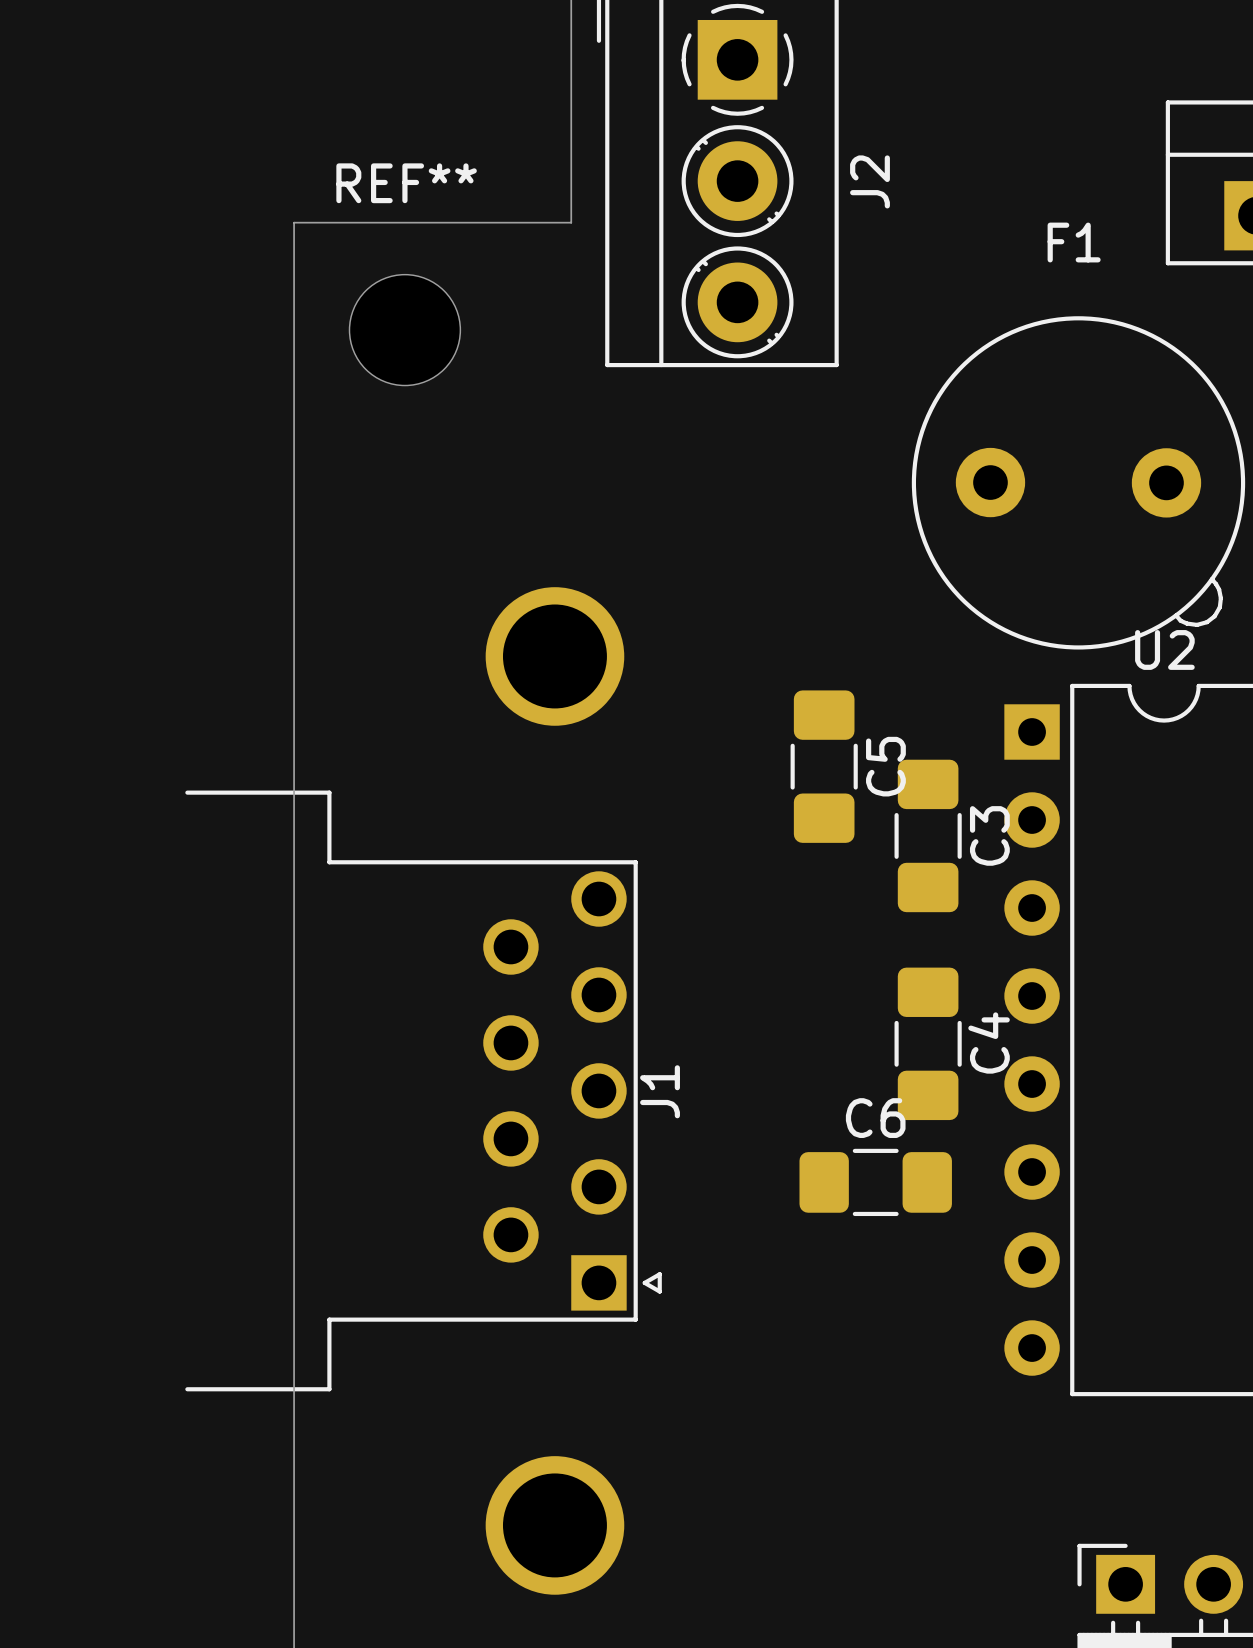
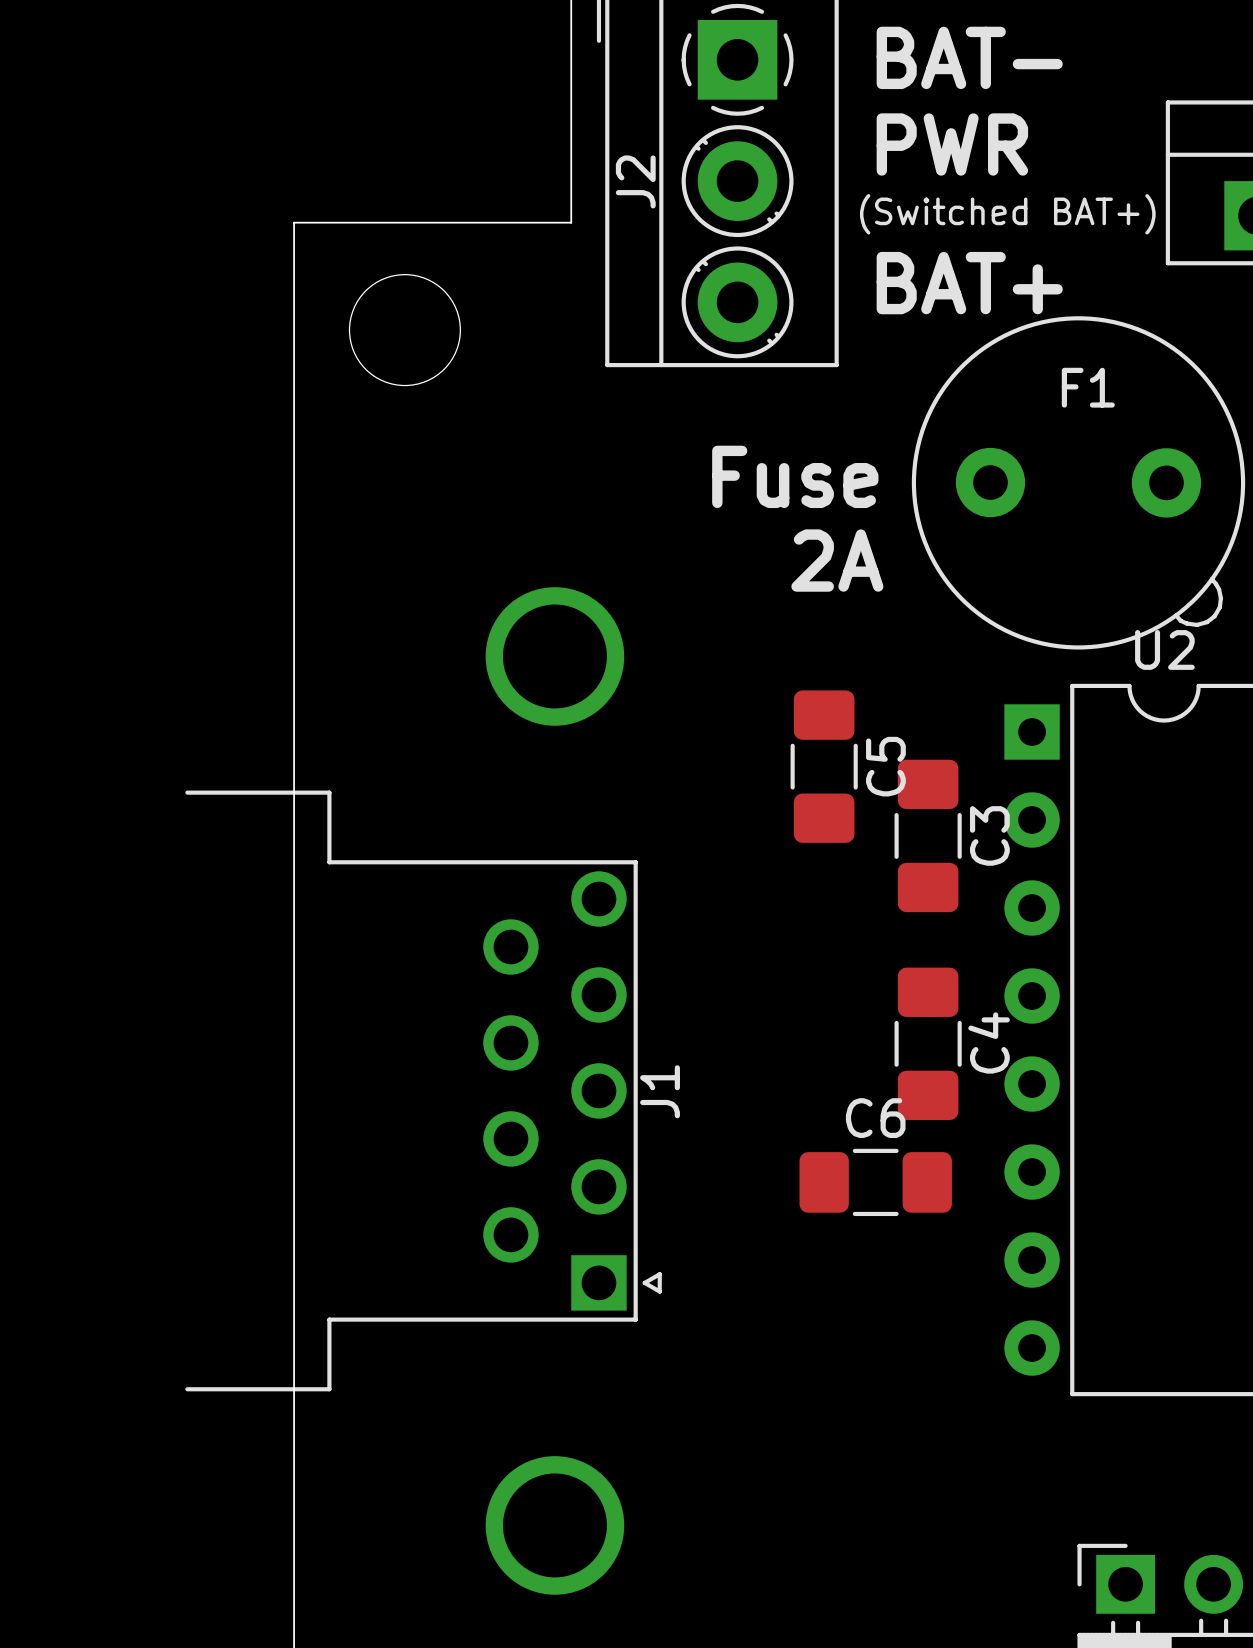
text: none -> BAT- (969, 57)
text: none -> PWR (952, 144)
J2 name position: J2 (870, 181) -> J2 (635, 181)
REF** name: REF** (406, 183) -> none
text: none -> (Switched BAT+) (1007, 214)
F1 name position: F1 (1074, 242) -> F1 (1088, 387)
text: none -> BAT+ (969, 283)
text: none -> Fuse (795, 476)
text: none -> 2A (837, 560)

